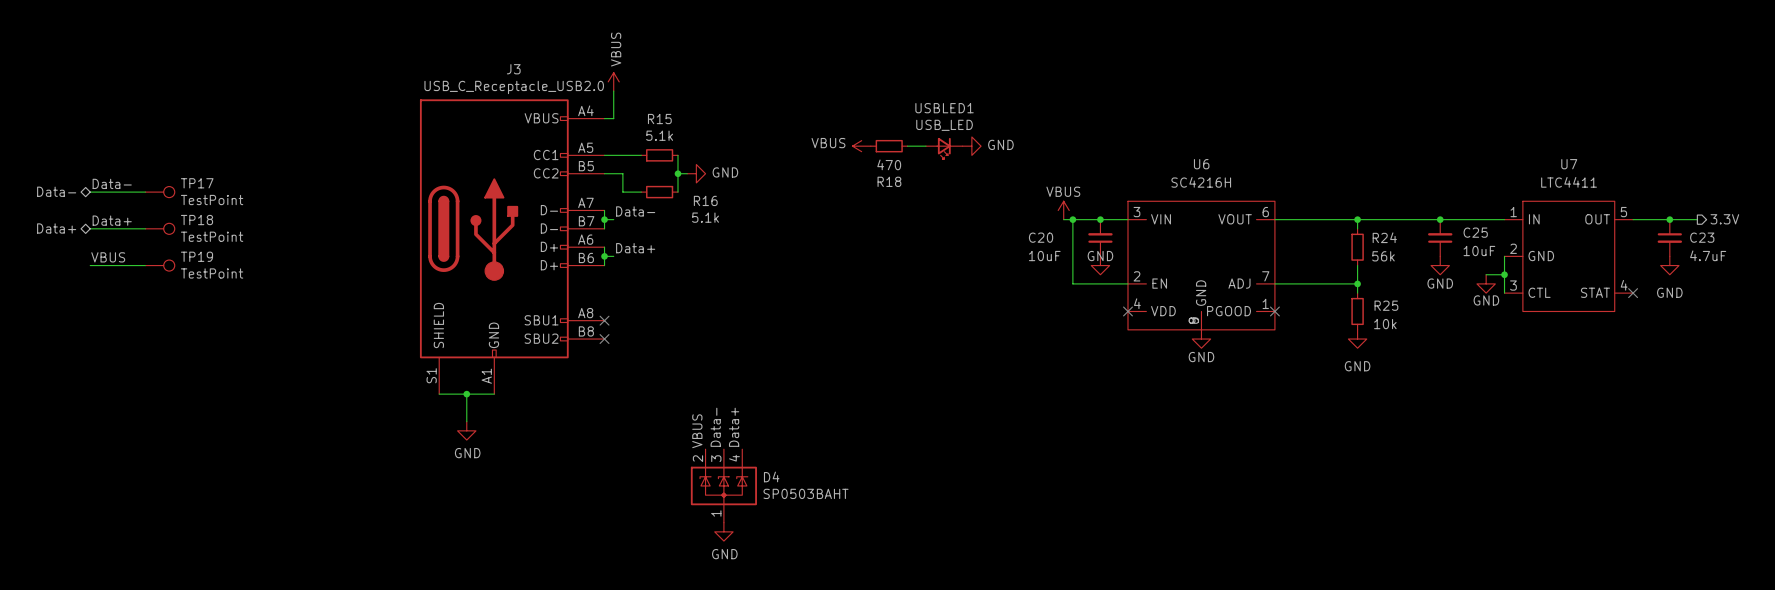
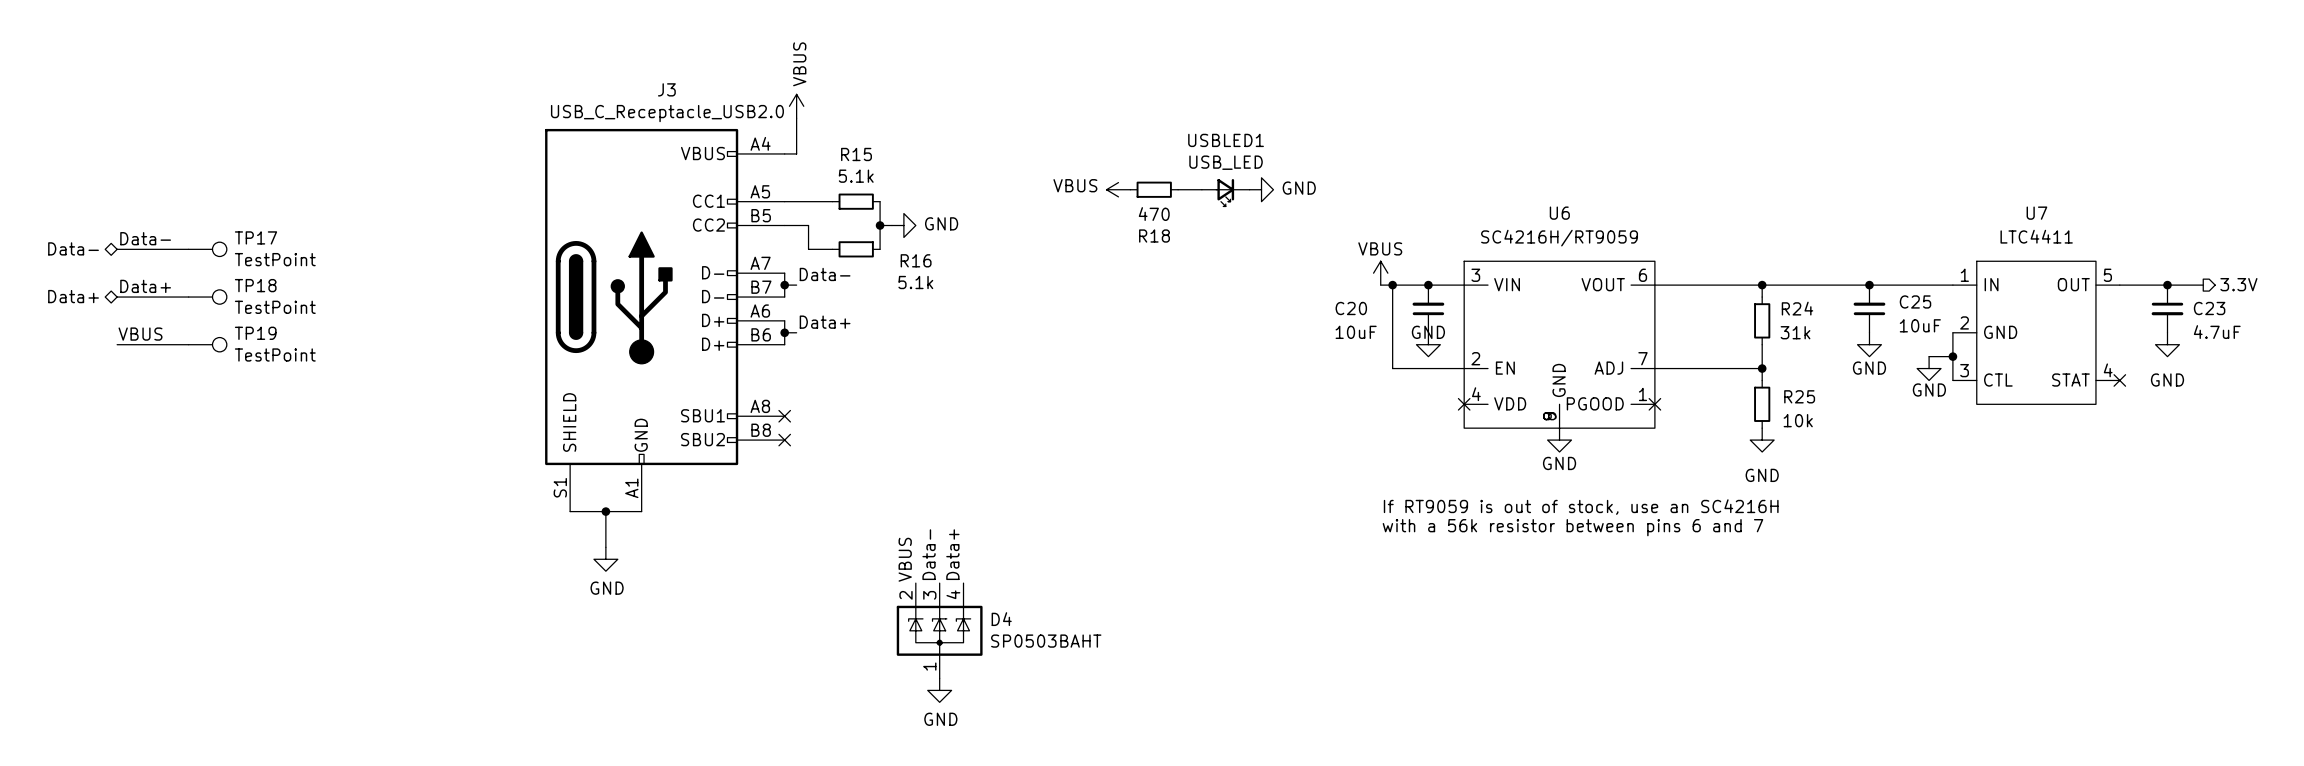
U6 value: SC4216H (1201, 182) -> SC4216H/RT9059 (1559, 238)
R24 value: 56k (1383, 256) -> 31k (1795, 332)
text: none -> If RT9059 is out of stock, use an SC4216H (1581, 507)
text: none -> with a 56k resistor between pins 6 and 7 (1572, 527)

